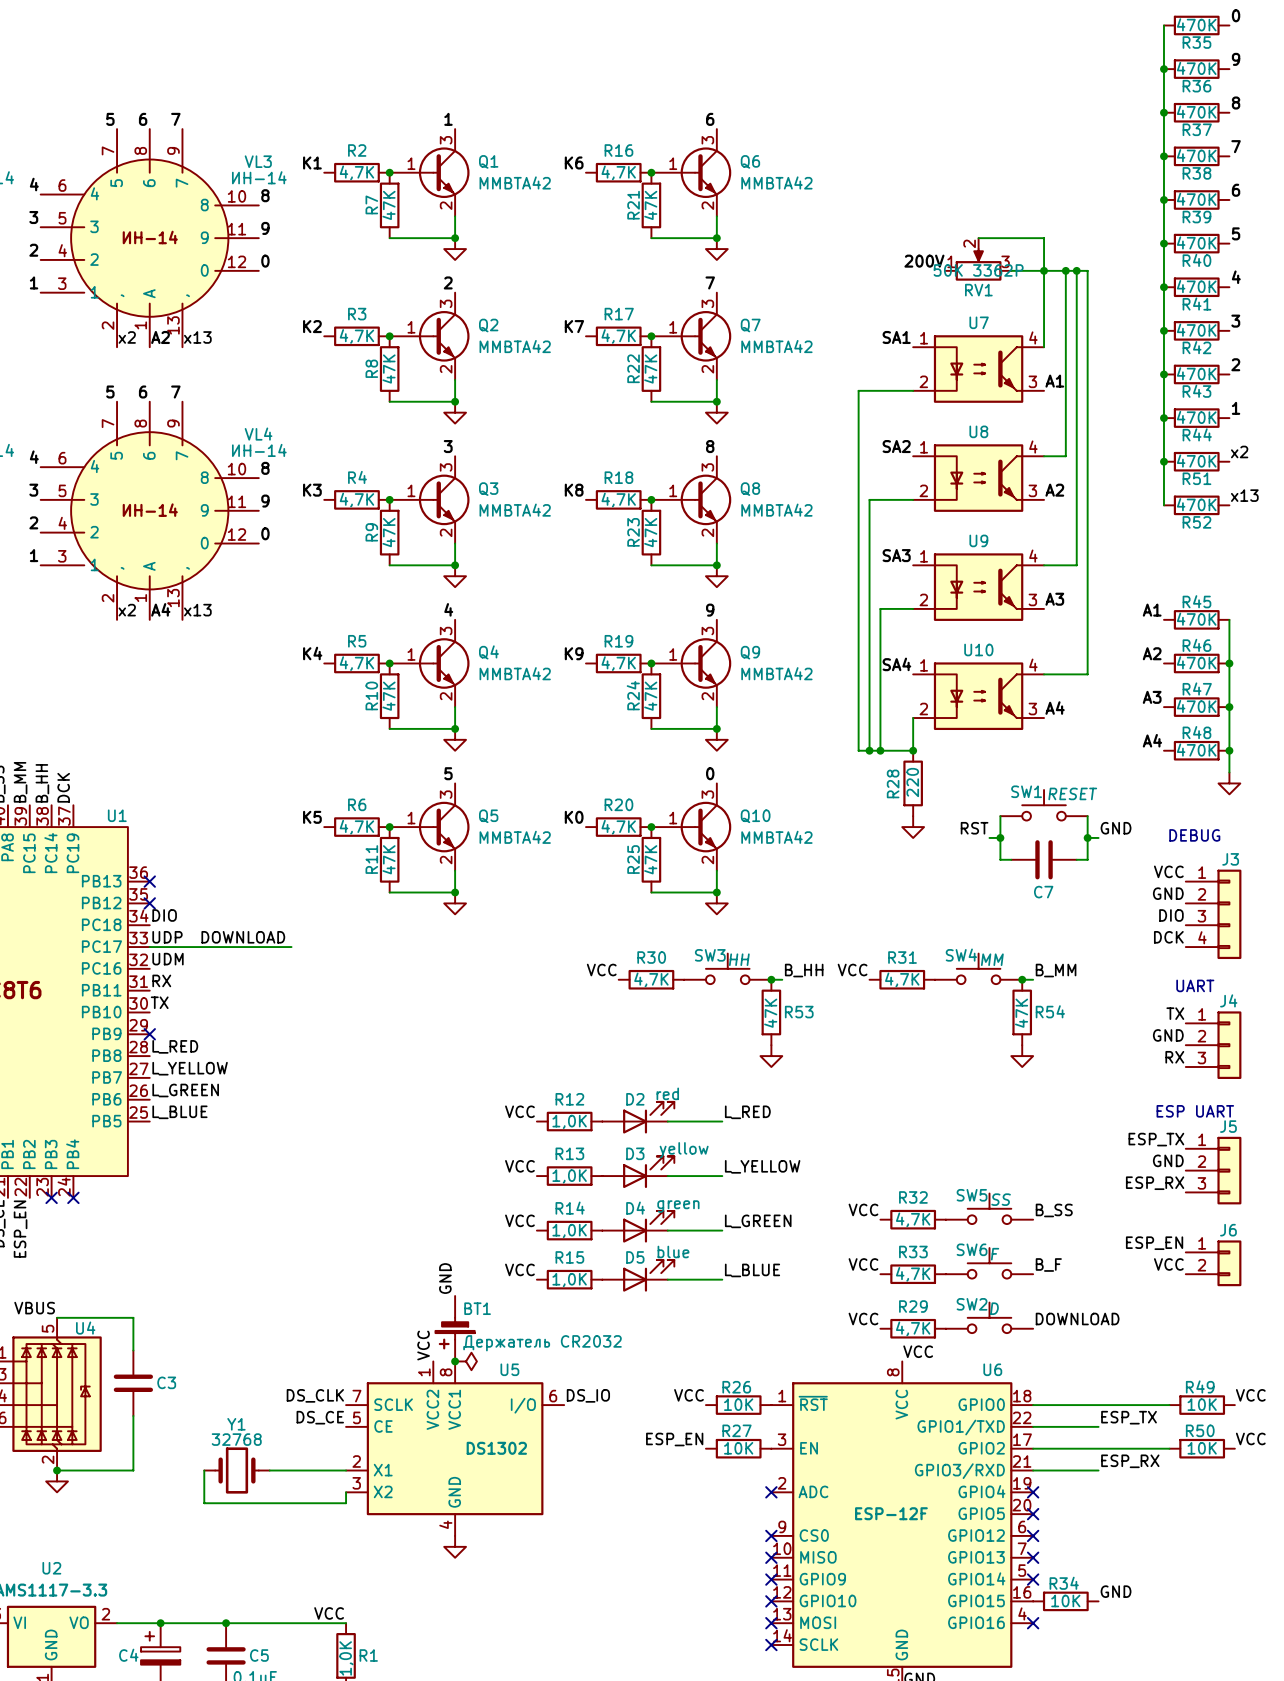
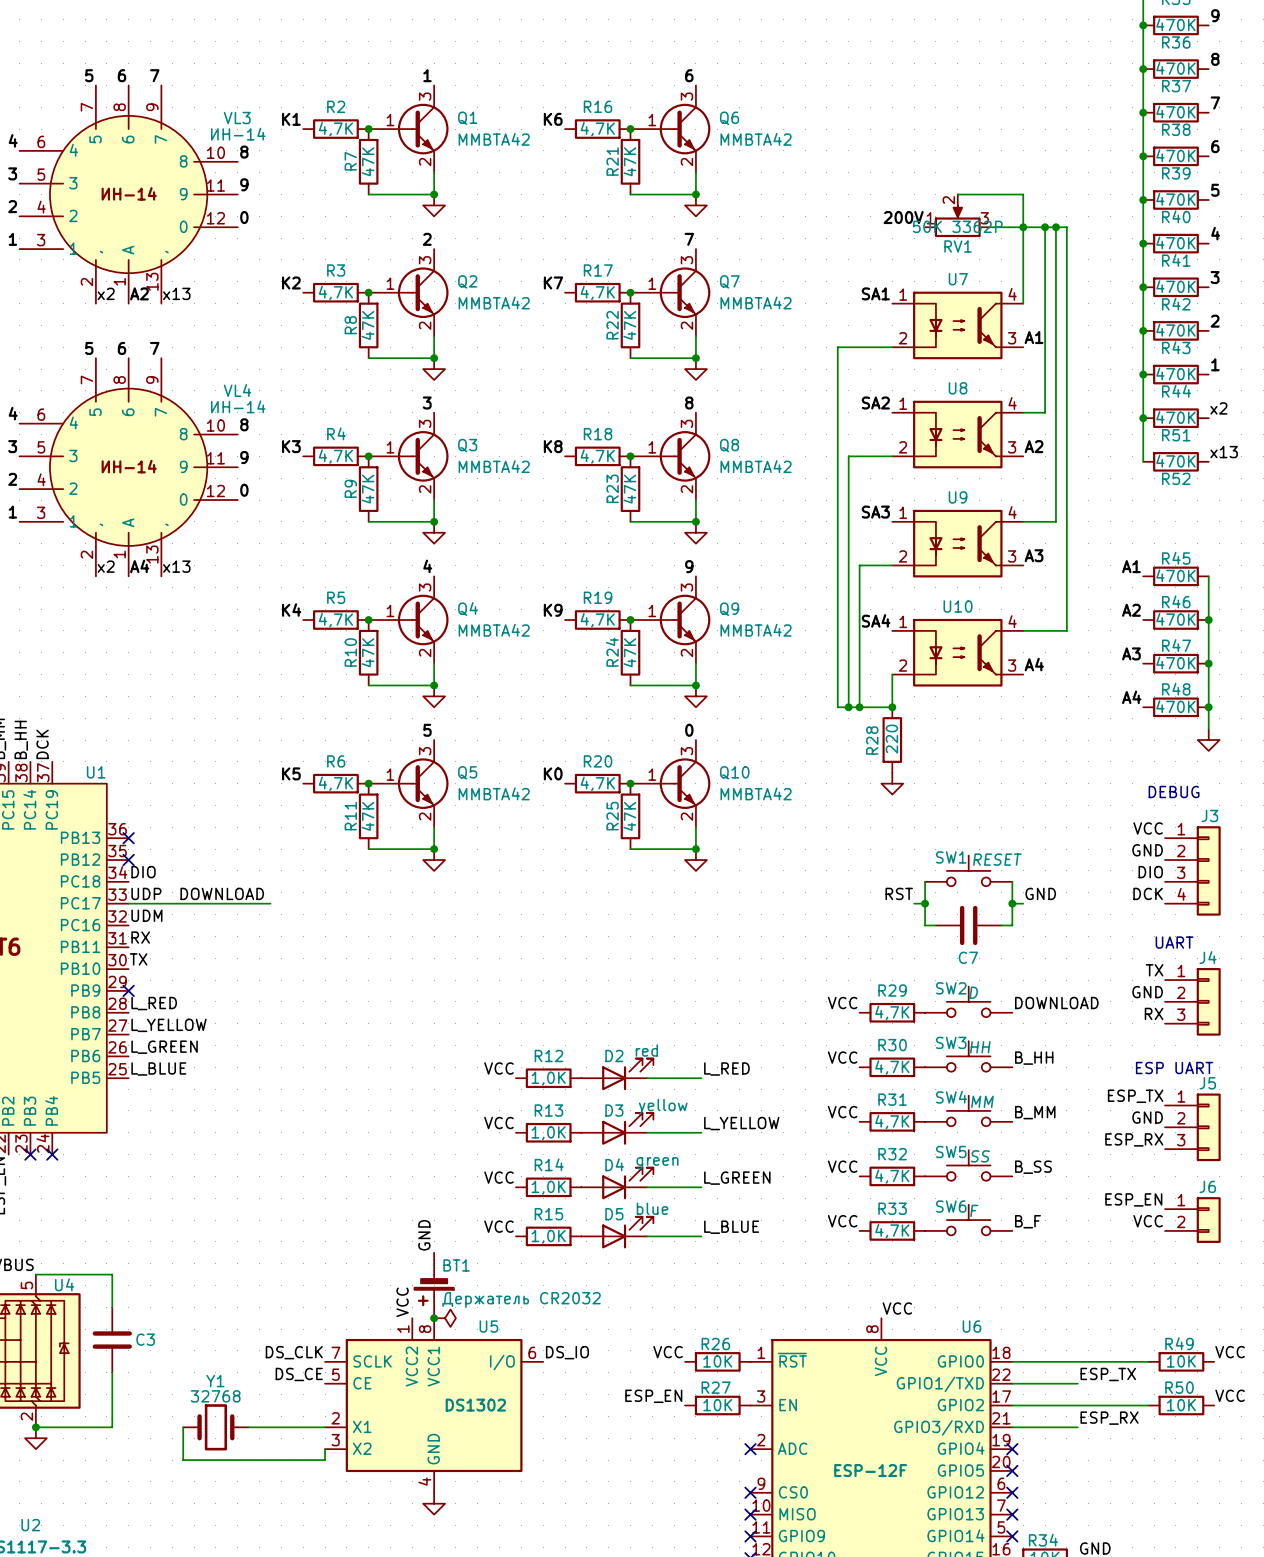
SW1 position: (1044, 805) -> (968, 870)
wire: (1000, 816) (1000, 859) (1011, 859) -> (925, 881) (925, 925) (935, 925)
wire: (1087, 816) (1087, 859) (1076, 859) -> (1012, 881) (1012, 925) (1001, 925)
label position: RST (974, 828) -> RST (899, 893)
label position: GND (1116, 828) -> GND (1040, 893)
wire: (989, 837) (1000, 837) -> (914, 903) (925, 903)
junction: (1000, 837) -> none
wire: (1087, 837) (1098, 837) -> (1012, 903) (1023, 903)
junction: (1087, 837) -> none
C7 position: (1044, 859) -> (968, 925)
junction: none -> (925, 903)
SW3 position: (727, 968) -> (968, 1056)
SW4 position: (978, 968) -> (968, 1110)
label: VCC (601, 970) -> none
label: B_HH (804, 970) -> none
label: VCC (852, 970) -> none
label position: B_MM (1056, 970) -> B_MM (1035, 1112)
R30 position: (651, 979) -> (892, 1067)
wire: (771, 979) (782, 979) -> none
junction: (771, 979) -> none
R31 position: (902, 979) -> (892, 1121)
wire: (1022, 979) (1033, 979) -> none
junction position: (1022, 979) -> (1012, 903)
R53: 47K (771, 1012) -> none
R54: 47K (1022, 1012) -> none
label: none -> VCC (842, 1003)
label: none -> DOWNLOAD (1056, 1003)
power symbol: (771, 1056) -> none
power symbol: (1022, 1056) -> none
label: none -> VCC (842, 1057)
label: none -> B_HH (1034, 1058)
label: none -> VCC (842, 1112)
SW2 position: (989, 1317) -> (968, 1001)
label: VCC (863, 1319) -> none
label: DOWNLOAD (1077, 1319) -> none
R29 position: (913, 1328) -> (892, 1012)

